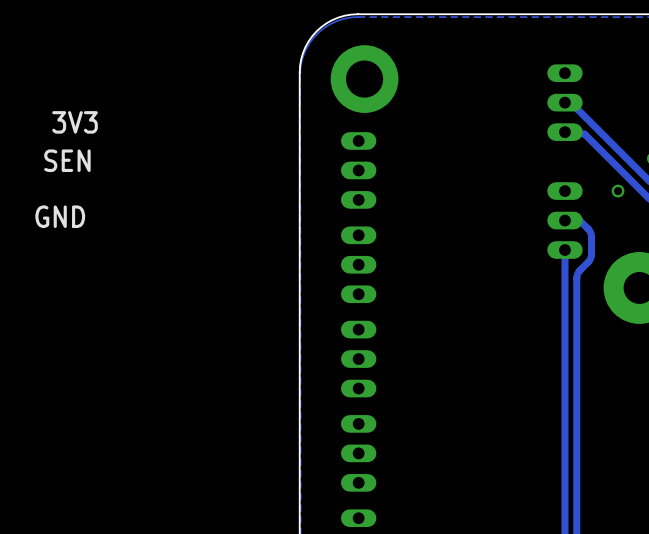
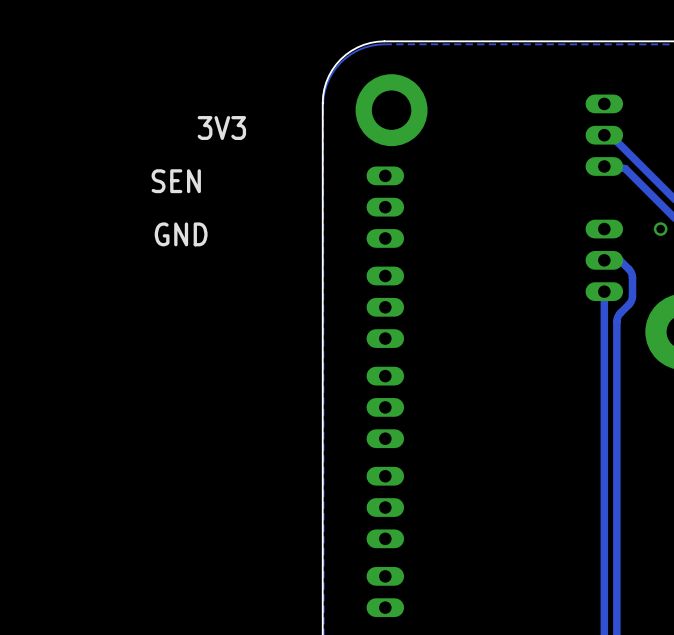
text position: 3V3 (75, 122) -> 3V3 (221, 128)
text position: SEN (67, 160) -> SEN (176, 181)
text position: GND (60, 216) -> GND (181, 234)

